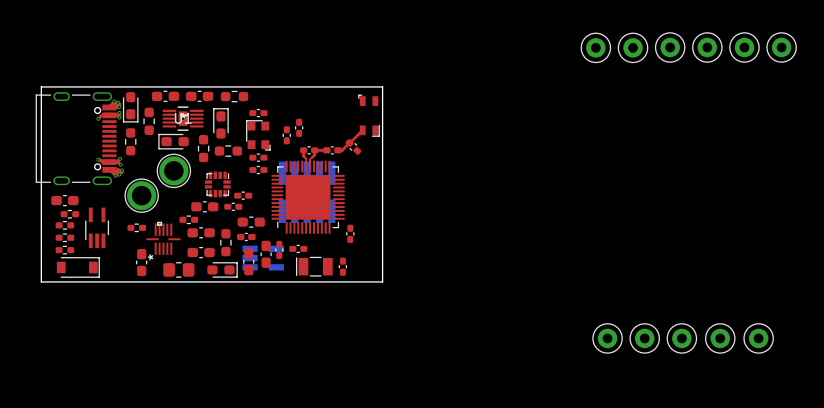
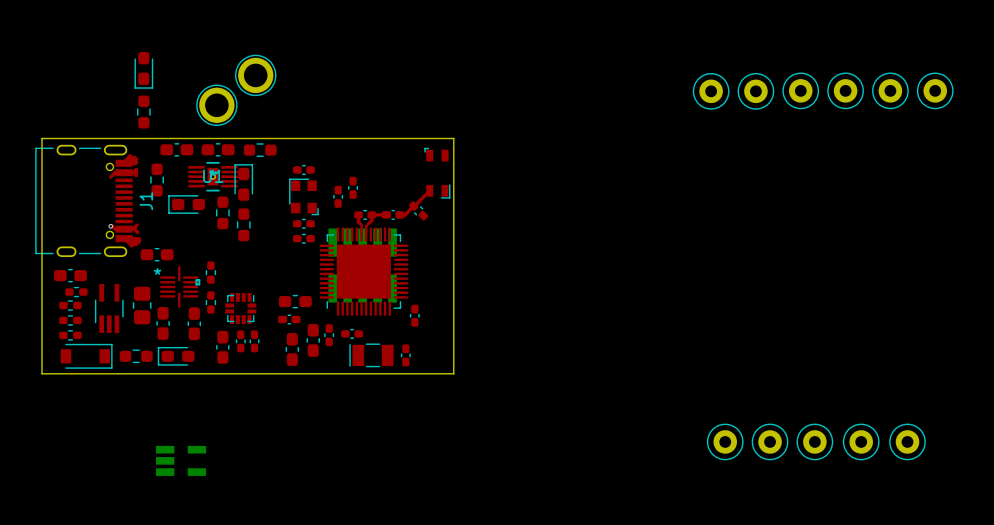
part: none -> (143, 70)
part: none -> (255, 75)
part: none -> (216, 105)
part: none -> (143, 112)
part: none -> (176, 149)
part: (165, 96) -> none
part: none -> (218, 149)
part: (199, 96) -> none
part position: (234, 96) -> (260, 150)
via: (114, 101) -> none
via: (118, 102) -> none
via: (119, 106) -> none
part: (130, 107) -> none
via: (119, 112) -> none
via: (119, 117) -> none
via: (98, 118) -> none
part: none -> (157, 180)
part: (149, 121) -> none
part position: (220, 123) -> (243, 182)
J1 name: none -> J1 (146, 201)
part: (130, 141) -> none
part position: (173, 141) -> (186, 204)
part: none -> (222, 212)
part: (203, 148) -> none
part: (228, 151) -> none
via: (120, 158) -> none
part: none -> (243, 224)
via: (120, 164) -> none
via: (122, 170) -> none
part: (173, 170) -> none
via: (119, 174) -> none
via: (115, 175) -> none
part: none -> (157, 254)
part: (217, 184) -> none
part: (141, 195) -> none
part: (243, 195) -> none
part: (204, 206) -> none
part: (233, 206) -> none
part: none -> (180, 286)
part rotation: 0° (188, 219) -> 90° clockwise (210, 302)
part footprint: [146, 221, 181, 255] -> [187, 307, 202, 341]
part rotation: 0° (136, 227) -> 90° clockwise (210, 272)
part position: (136, 227) -> (210, 272)
part footprint: [187, 227, 215, 239] -> [225, 293, 257, 324]
part: (225, 242) -> none
part footprint: [187, 247, 215, 259] -> [235, 330, 246, 353]
part: none -> (254, 341)
part position: (263, 258) -> (181, 460)
part: none -> (222, 347)
part position: (141, 262) -> (163, 323)
part: none -> (136, 356)
part: none -> (176, 356)
part rotation: 0° (178, 269) -> 90° clockwise (142, 305)
part position: (178, 269) -> (142, 305)
part: (222, 269) -> none

